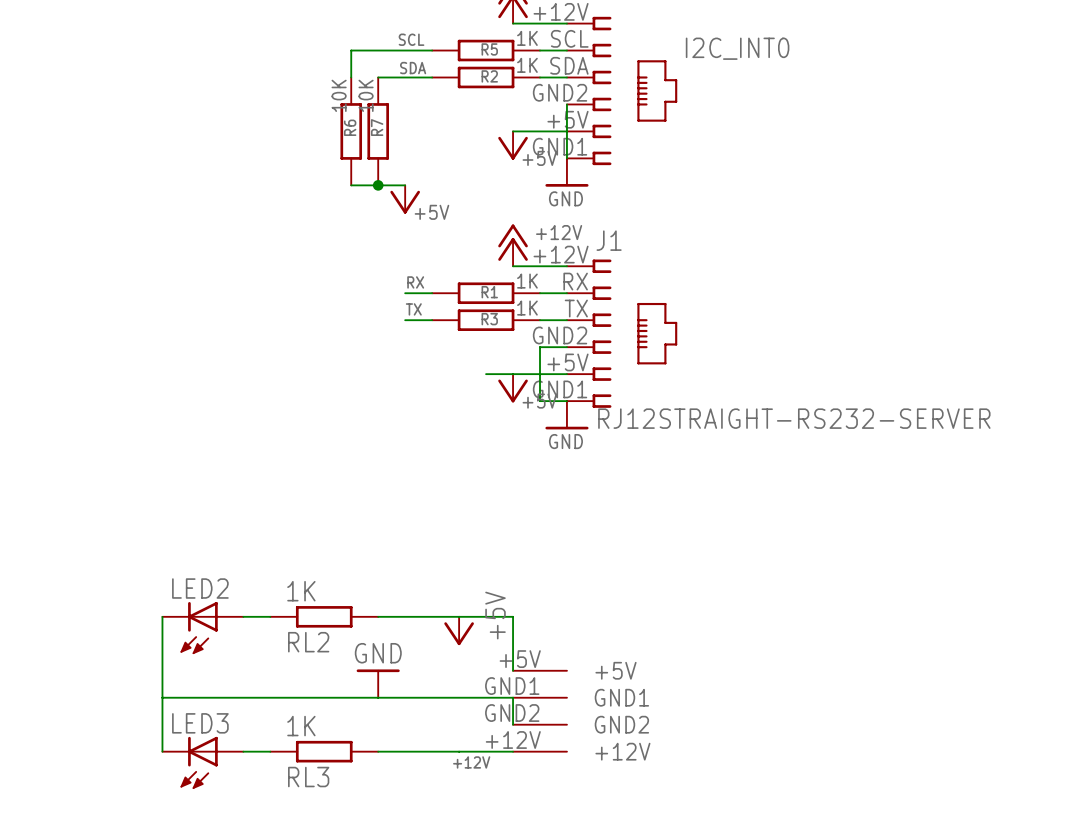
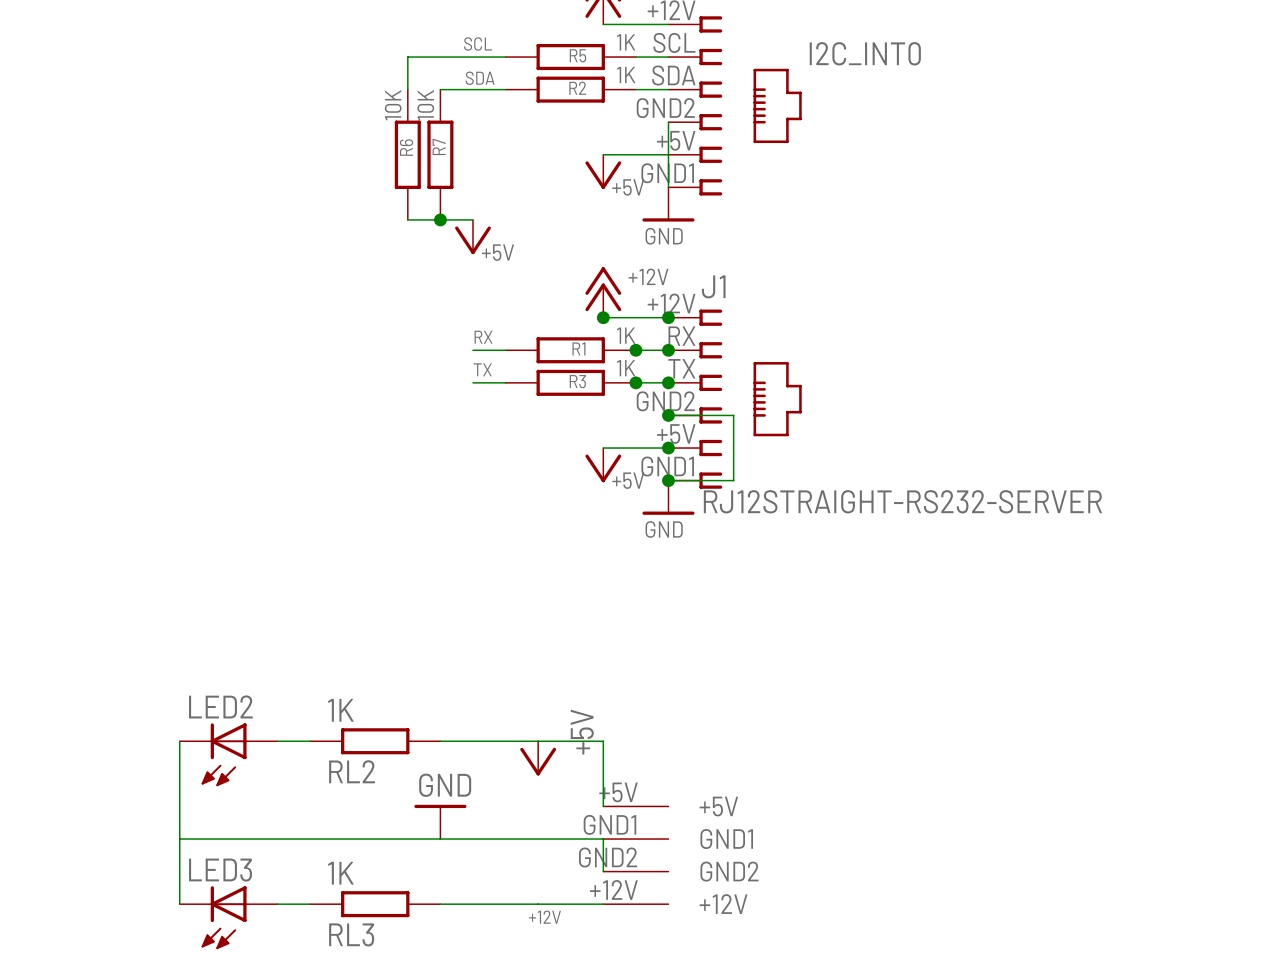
junction: none -> (603, 317)
junction: none -> (668, 317)
junction: none -> (635, 350)
junction: none -> (668, 350)
junction: none -> (635, 382)
junction: none -> (668, 382)
wire: (566, 347) (540, 347) (540, 401) (566, 401) -> (668, 415) (733, 415) (733, 480) (668, 480)
junction: none -> (668, 415)
wire: (486, 374) (513, 374) -> none
junction: none -> (668, 448)
junction: none -> (668, 480)

